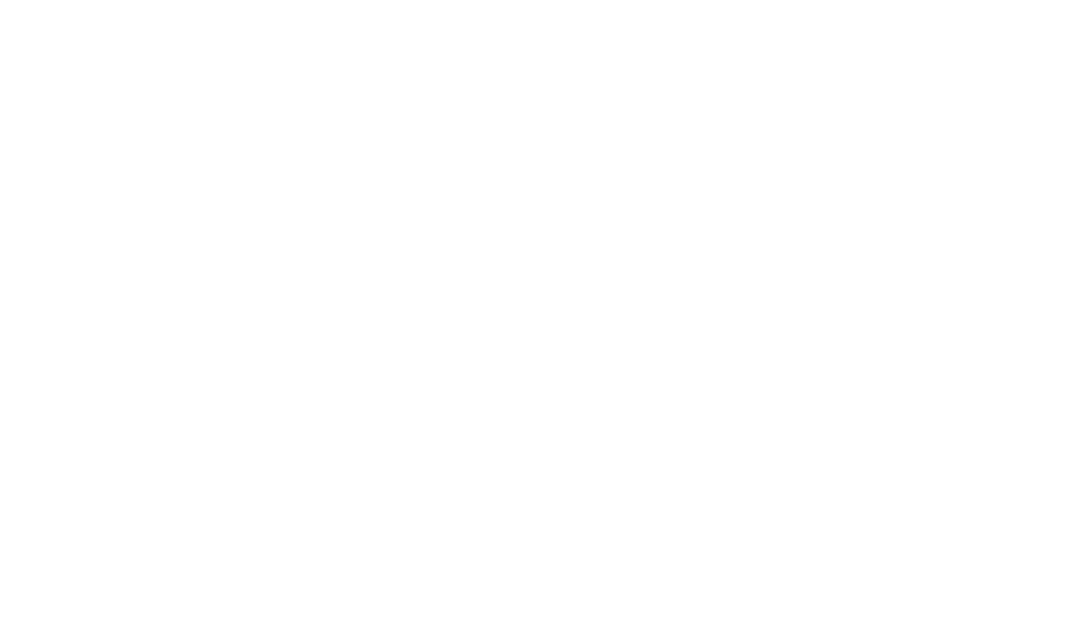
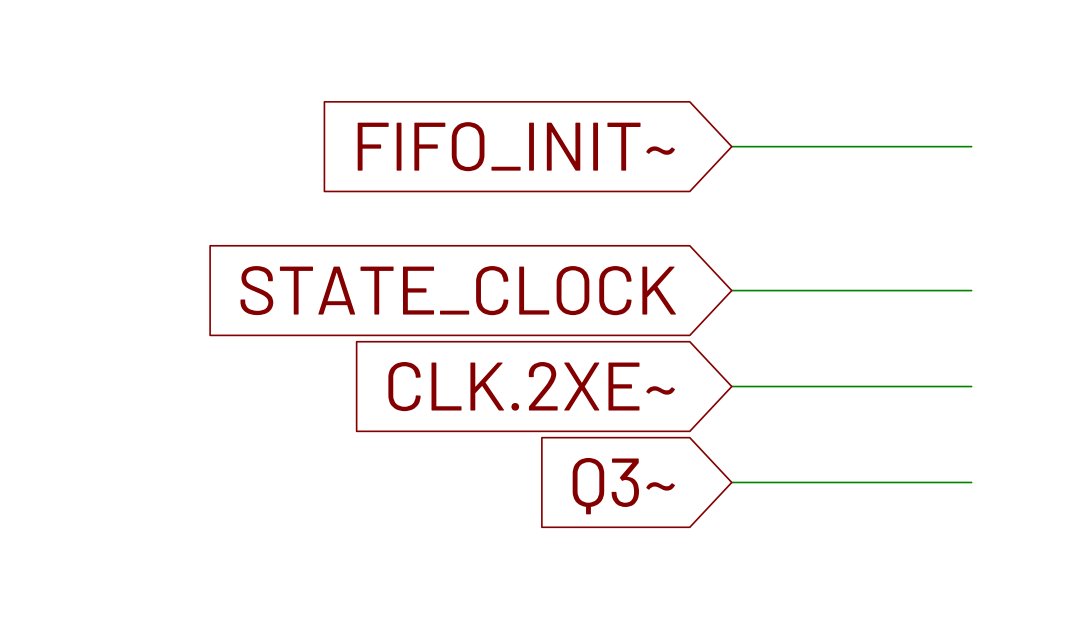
global label: none -> FIFO_INIT~ (516, 146)
wire: none -> (731, 146) (971, 146)
global label: none -> STATE_CLOCK (458, 290)
wire: none -> (731, 290) (971, 290)
global label: none -> CLK.2XE~ (531, 386)
wire: none -> (731, 386) (971, 386)
wire: none -> (731, 482) (971, 482)
global label: none -> Q3~ (623, 486)

